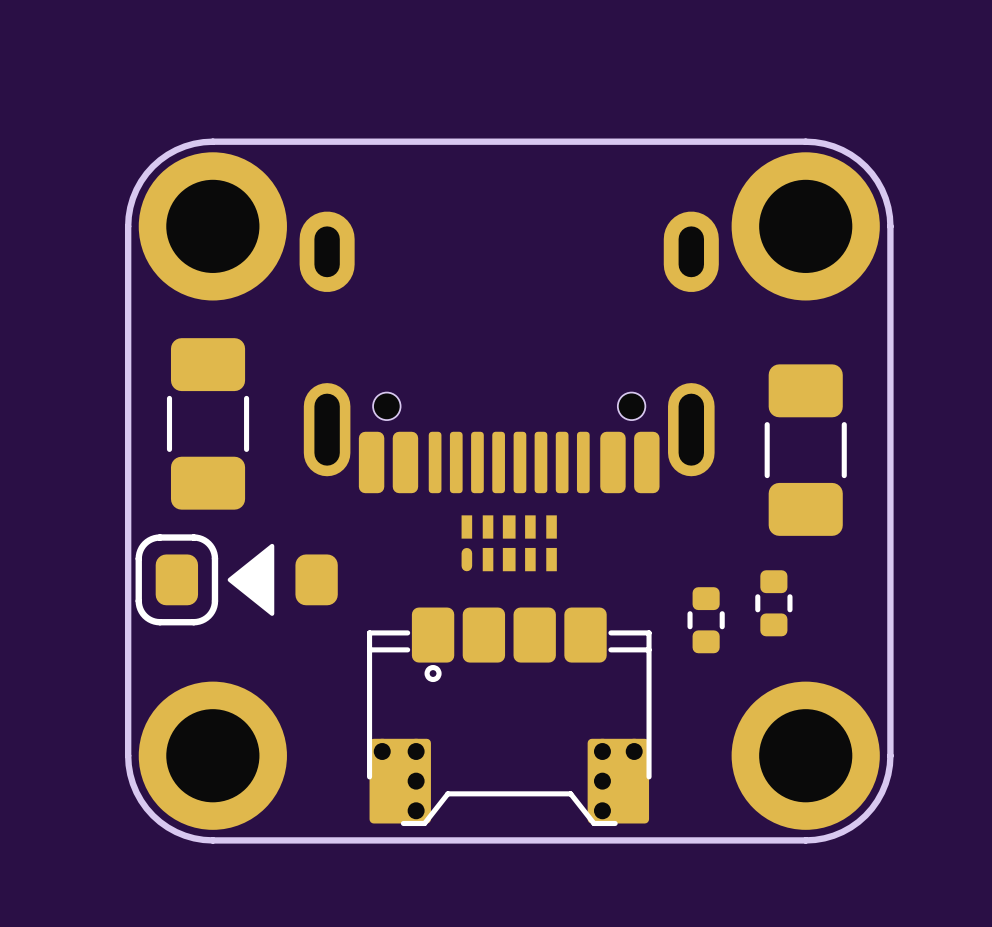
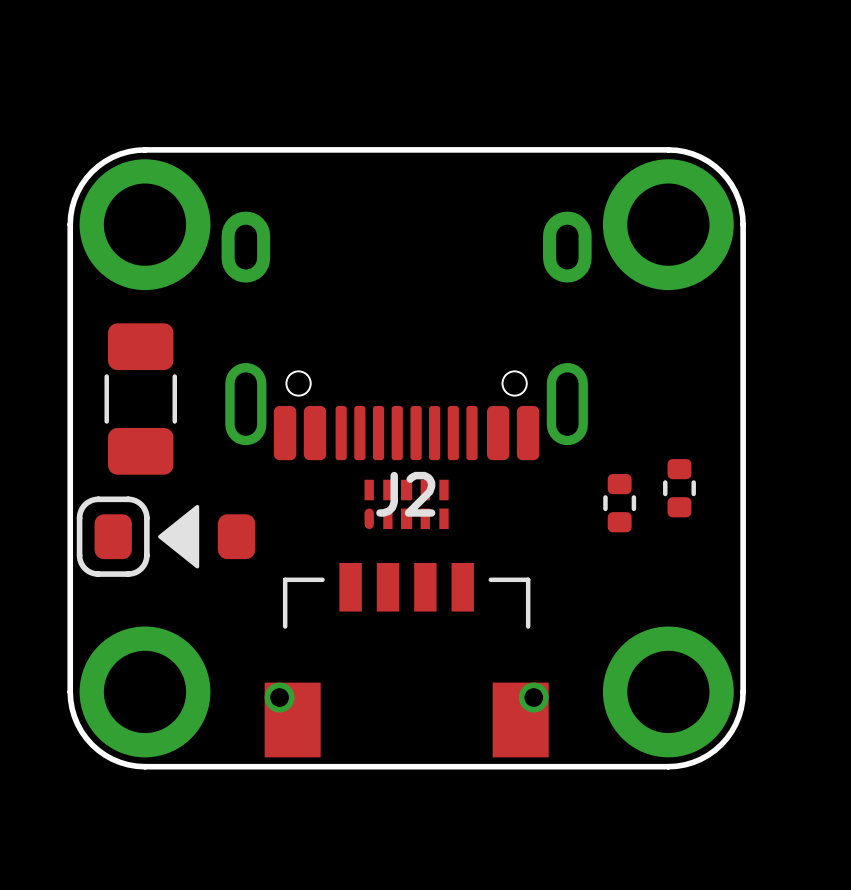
part: (805, 450) -> none
part: none -> (679, 488)
part: none -> (619, 503)
part: (773, 603) -> none
part: (706, 620) -> none
part: (509, 716) -> none
J2: none -> (406, 665)

